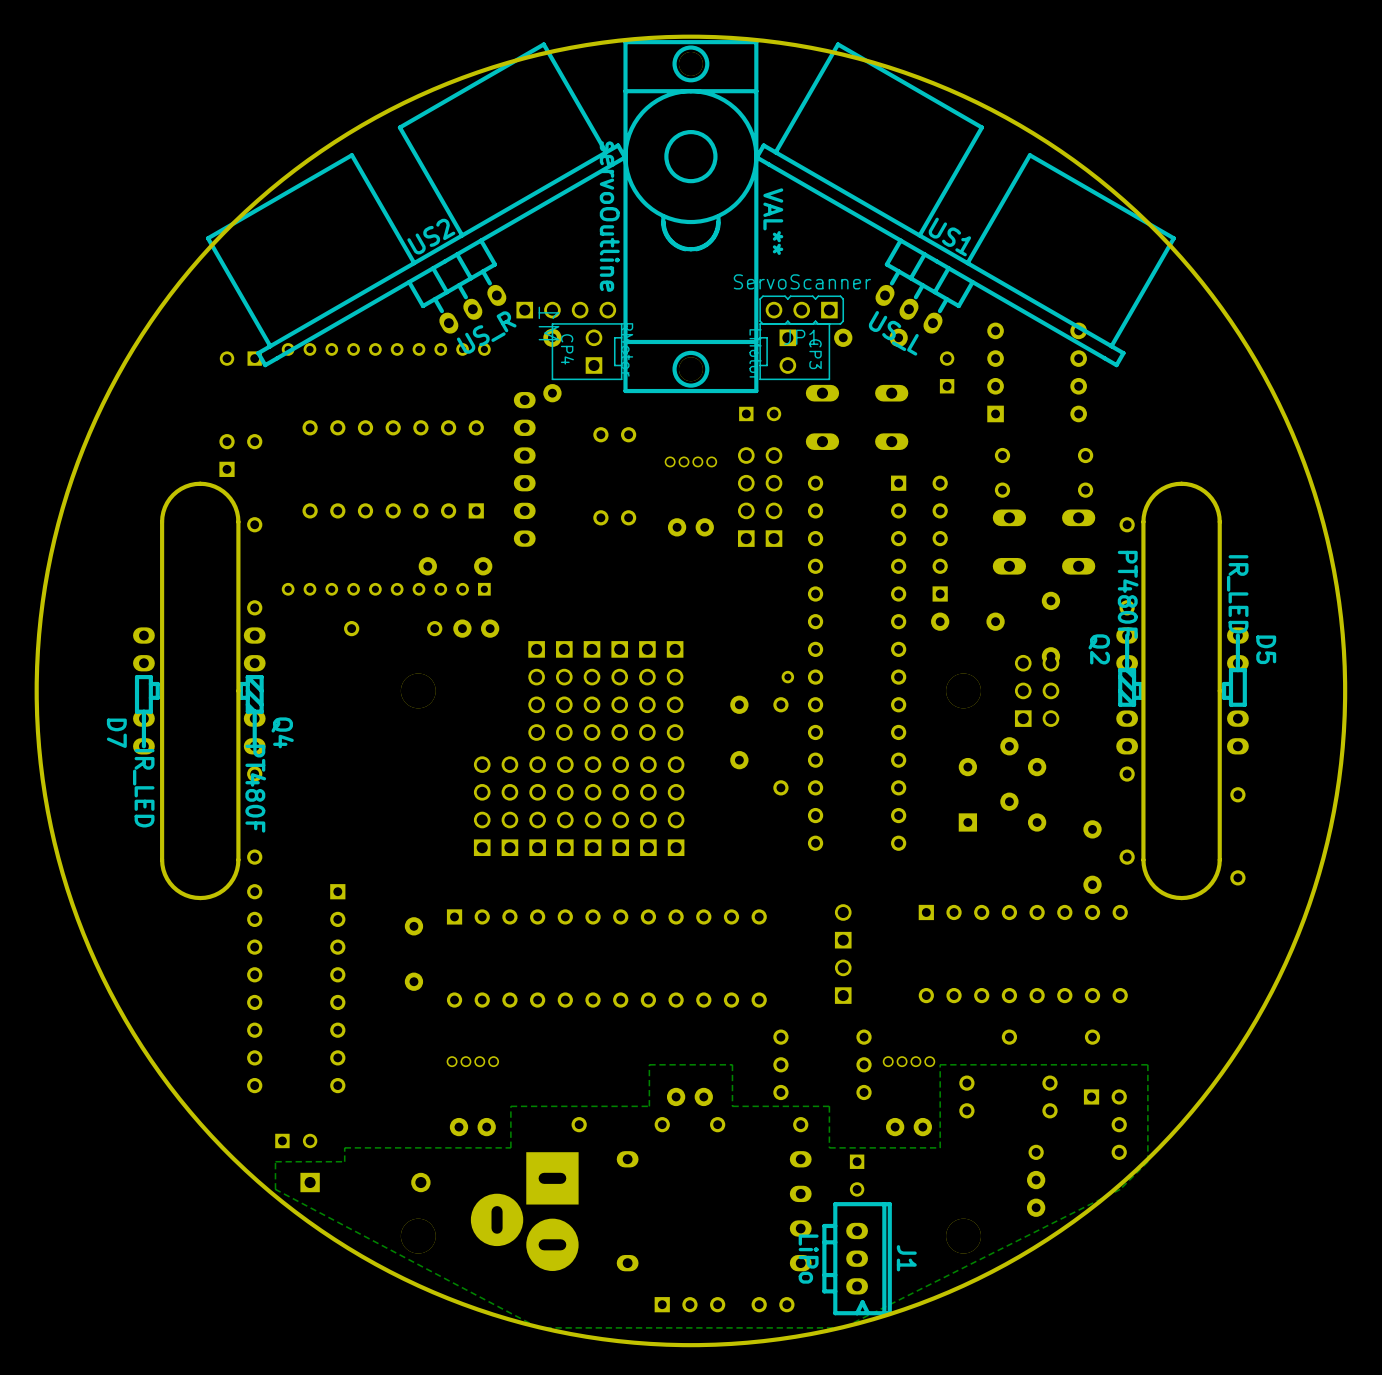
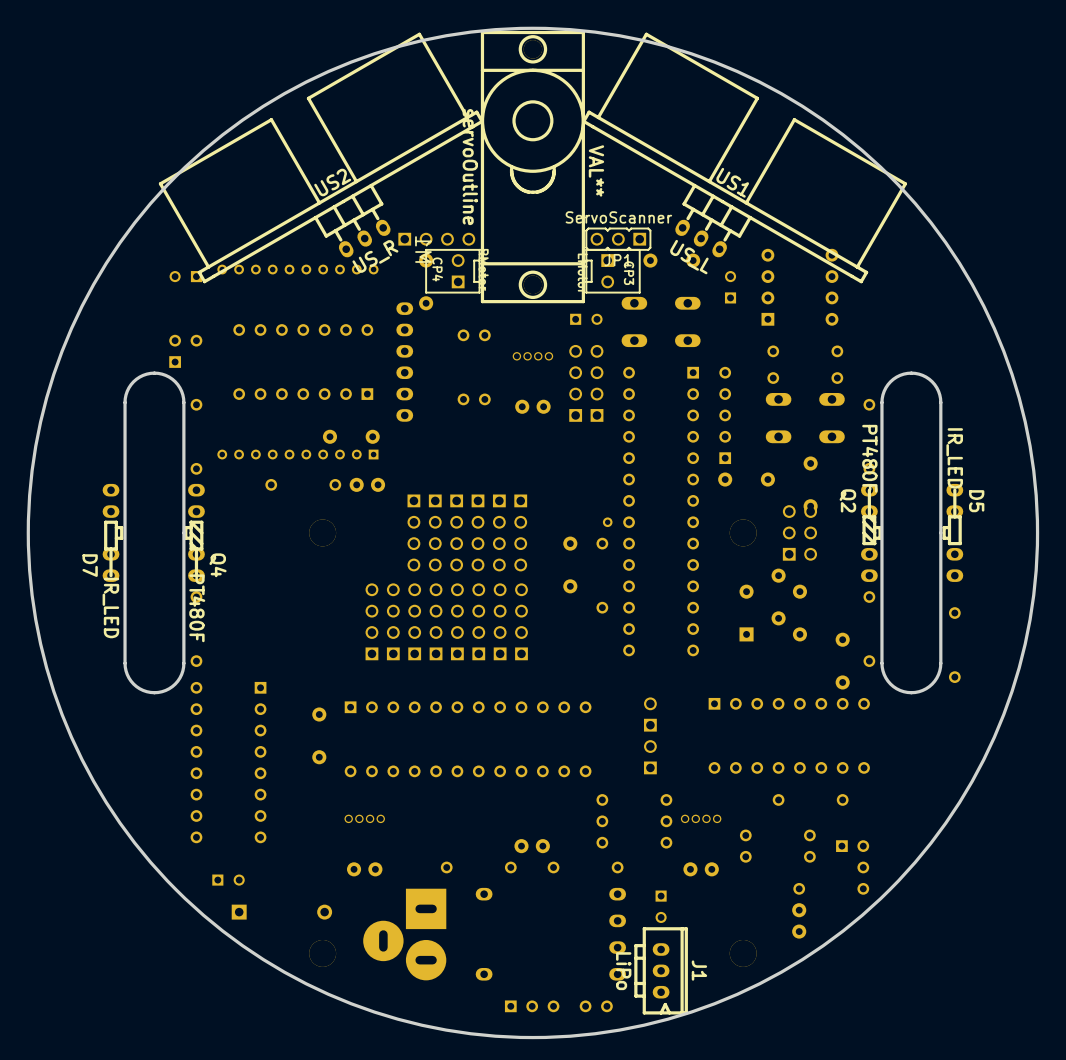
zone outline: (1147, 1064) (940, 1064) (940, 1147) (829, 1147) (829, 1106) (732, 1106) (732, 1064) (649, 1064) (649, 1106) (510, 1106) (510, 1147) (344, 1147) (344, 1161) (275, 1161) (275, 1189) (538, 1327) (843, 1327) (1120, 1189) (1147, 1161) (1147, 1064) -> none

